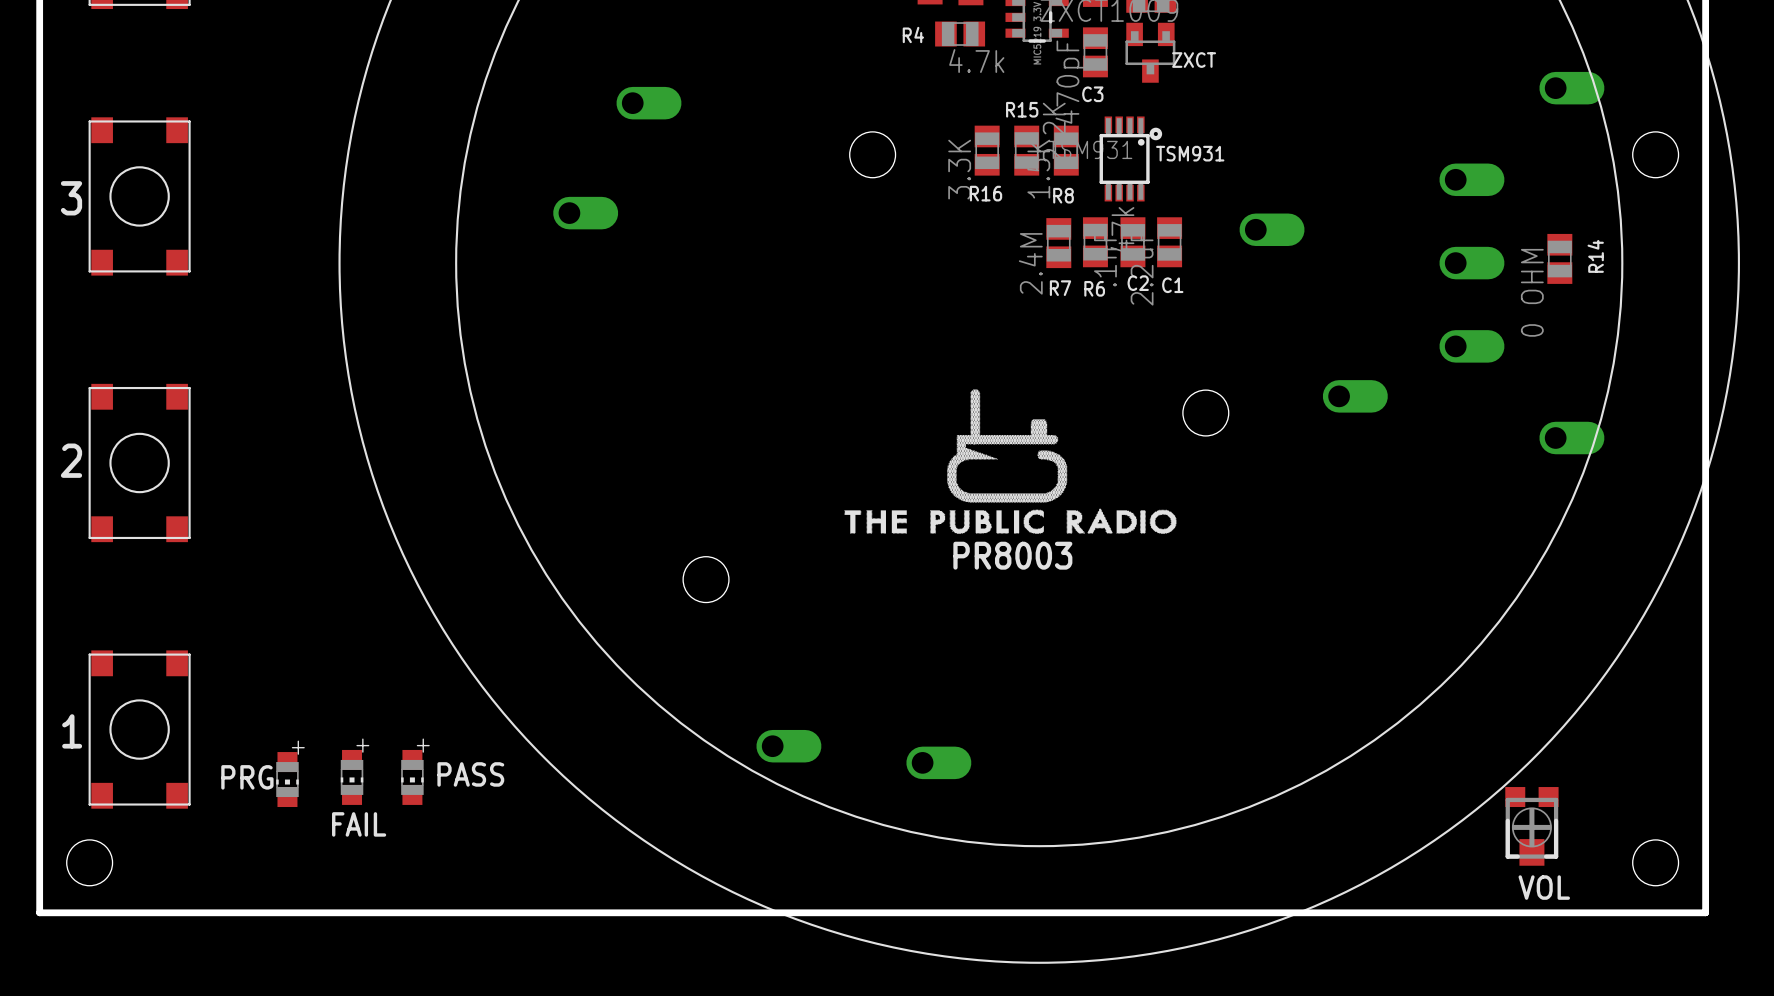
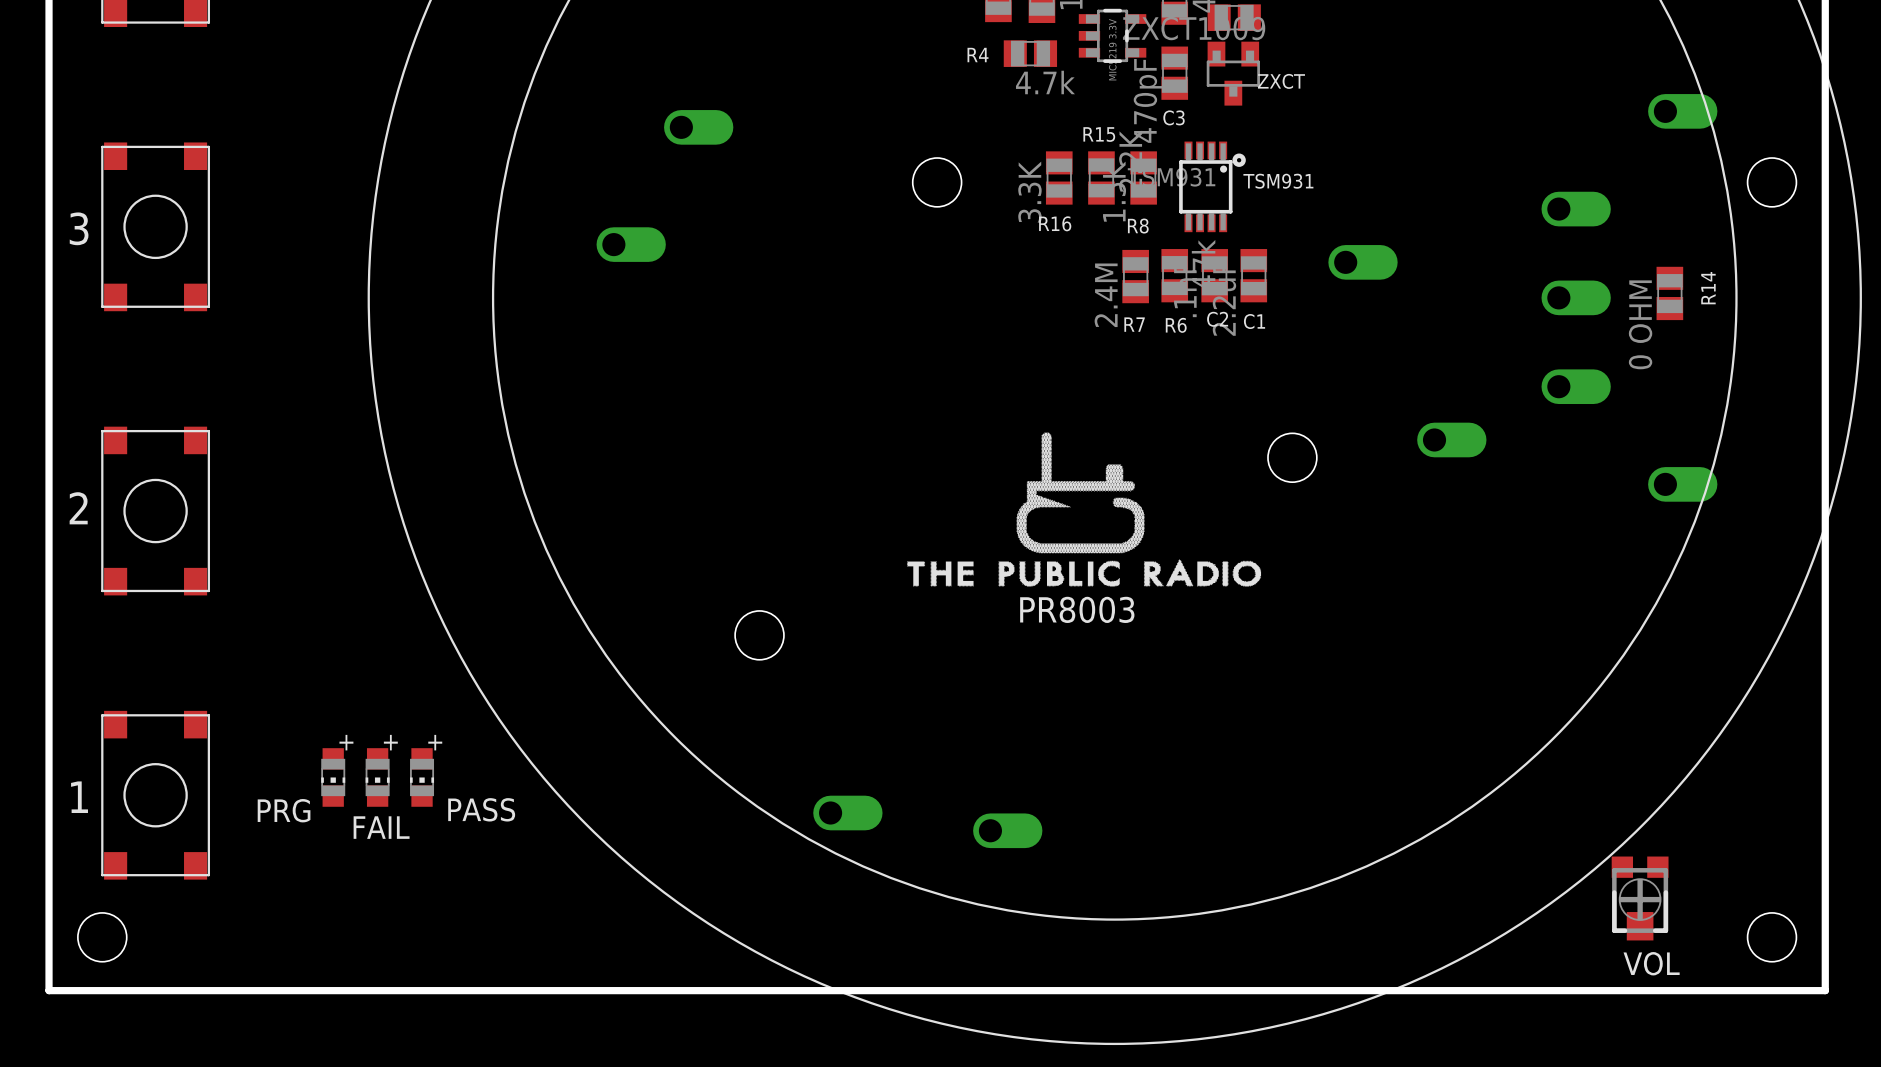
PASS name position: PASS (470, 774) -> PASS (481, 809)
PRG name position: PRG (247, 777) -> PRG (284, 810)
FAIL position: (352, 777) -> (377, 777)
PASS position: (412, 777) -> (422, 777)
PRG position: (287, 779) -> (333, 777)

